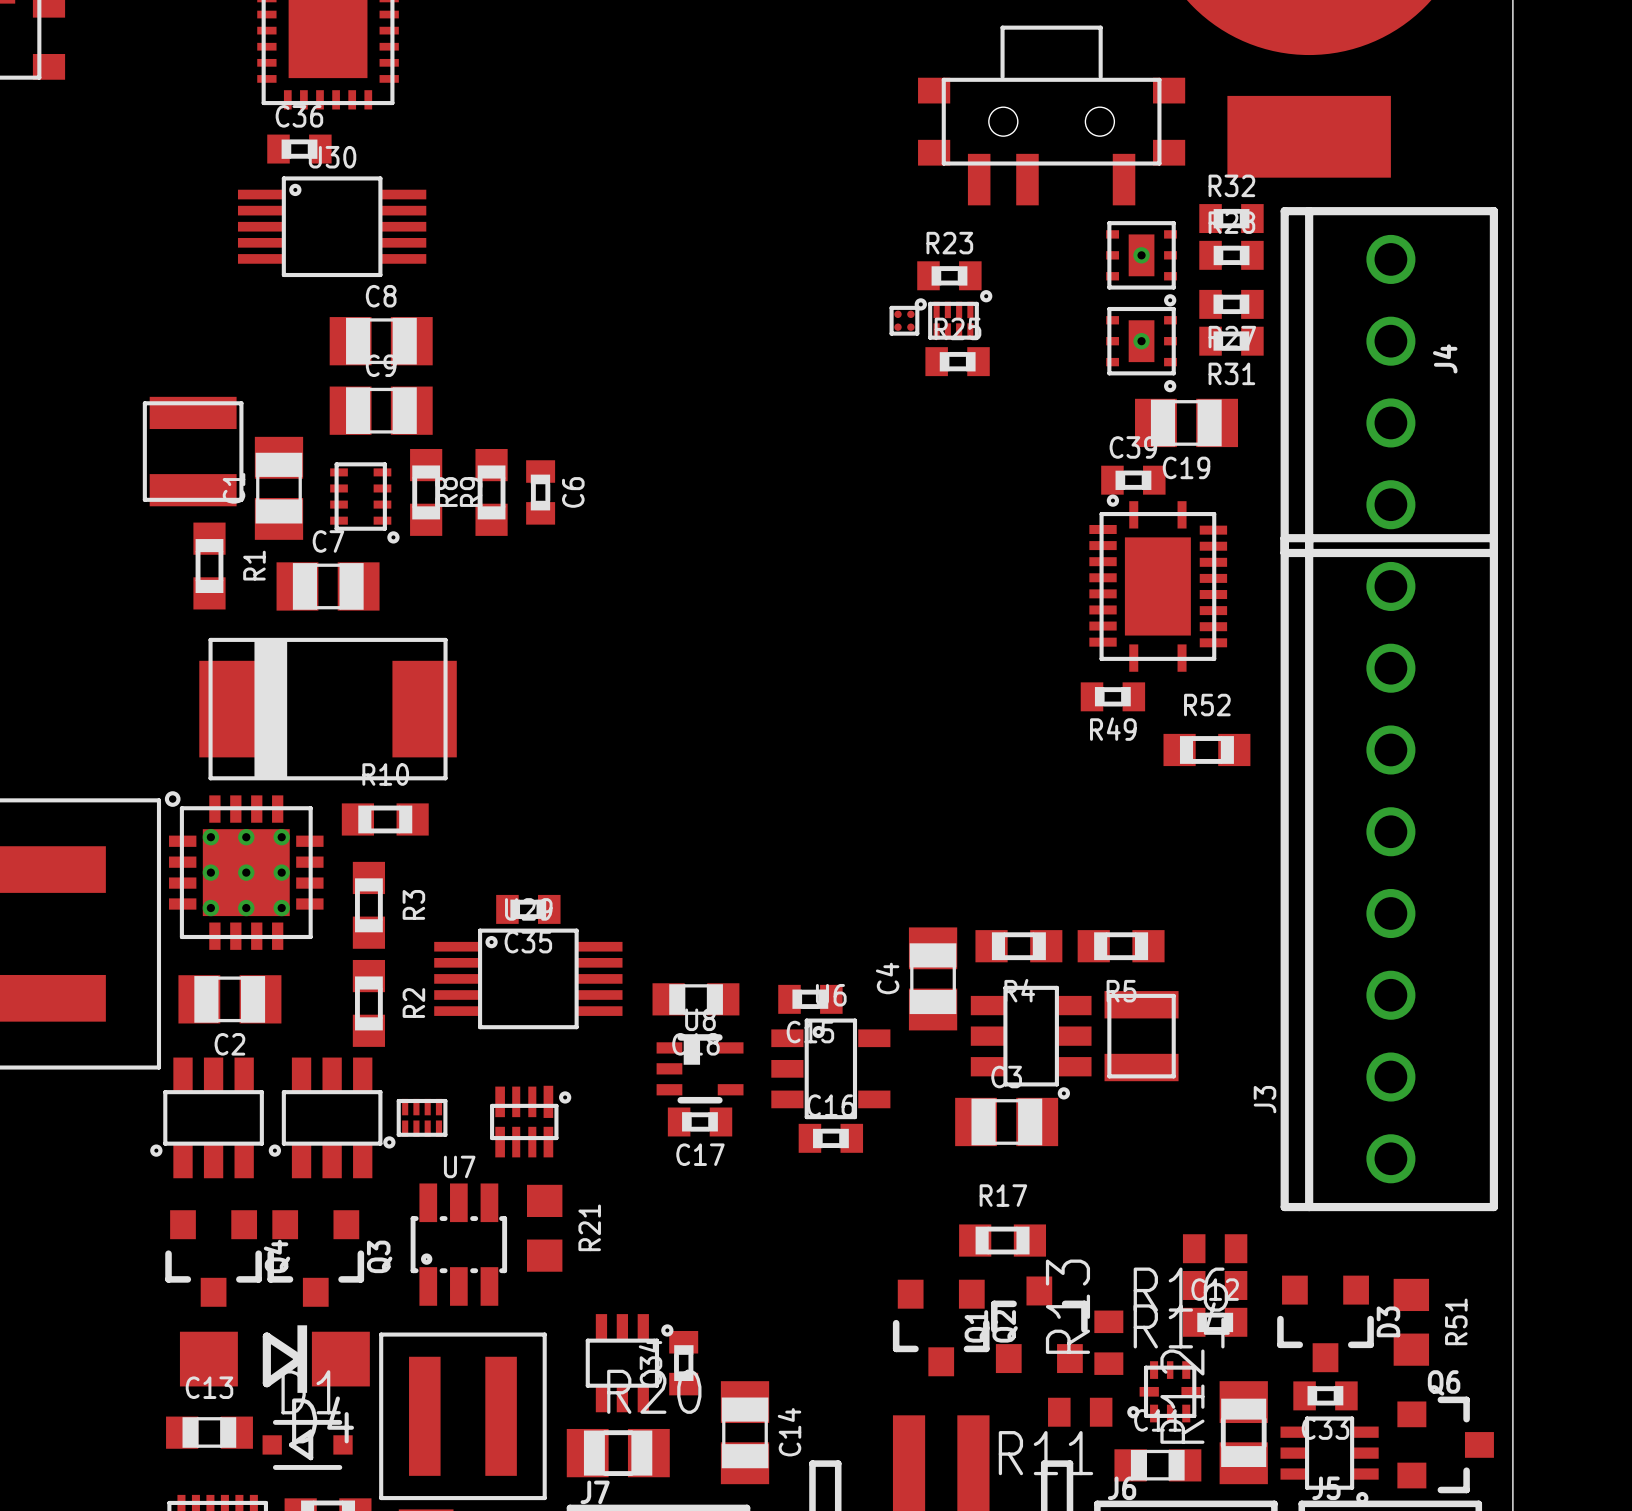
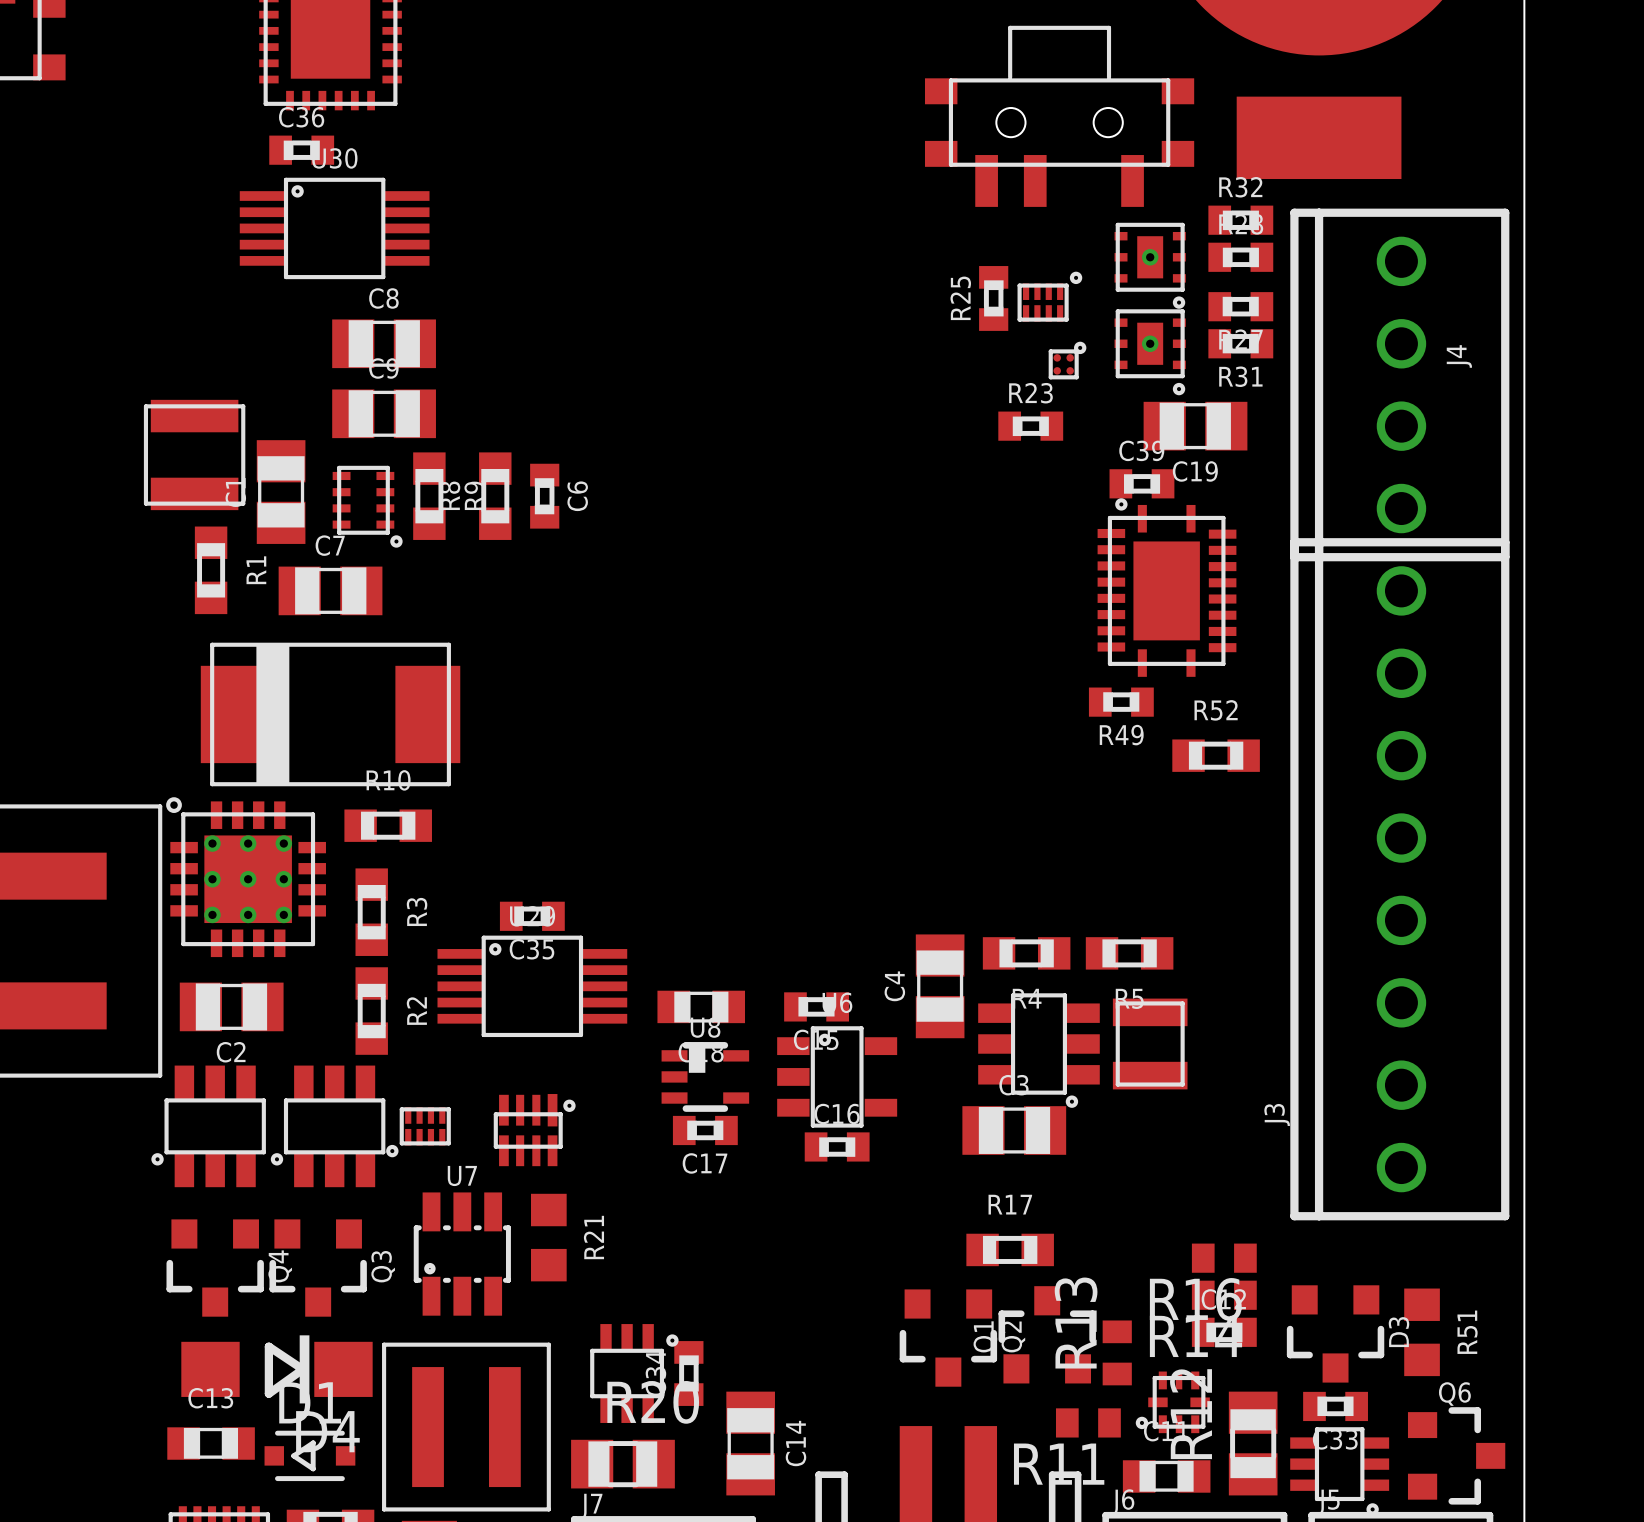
R23 position: (949, 275) -> (1030, 426)
part position: (960, 314) -> (1049, 296)
part position: (908, 316) -> (1067, 360)
R25 rotation: 0° (957, 361) -> 90° clockwise (993, 298)
R25 position: (957, 361) -> (993, 298)

